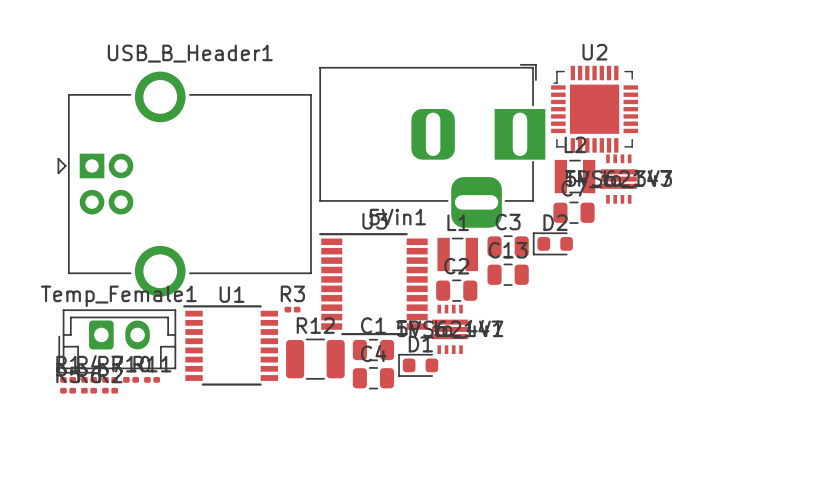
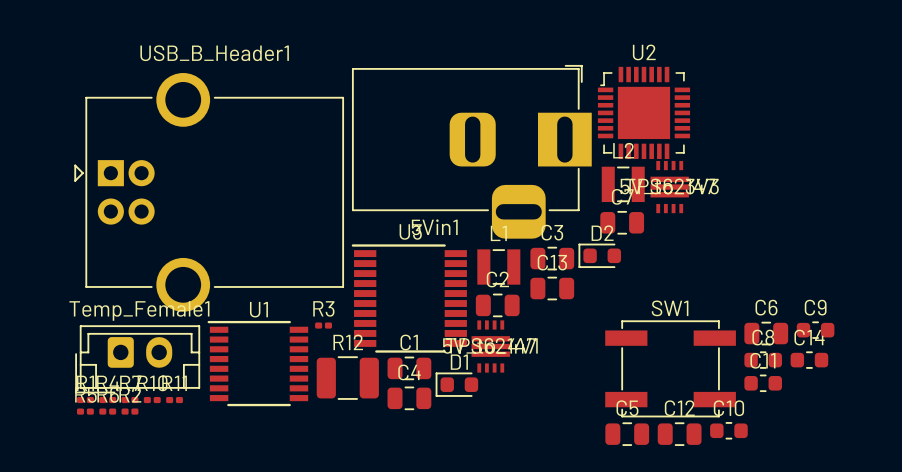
C9: none -> (815, 330)
C6: none -> (766, 333)
C8: none -> (763, 360)
C14: none -> (809, 360)
SW1: none -> (670, 368)
C11: none -> (763, 383)
C10: none -> (728, 430)
C5: none -> (627, 434)
C12: none -> (679, 434)

